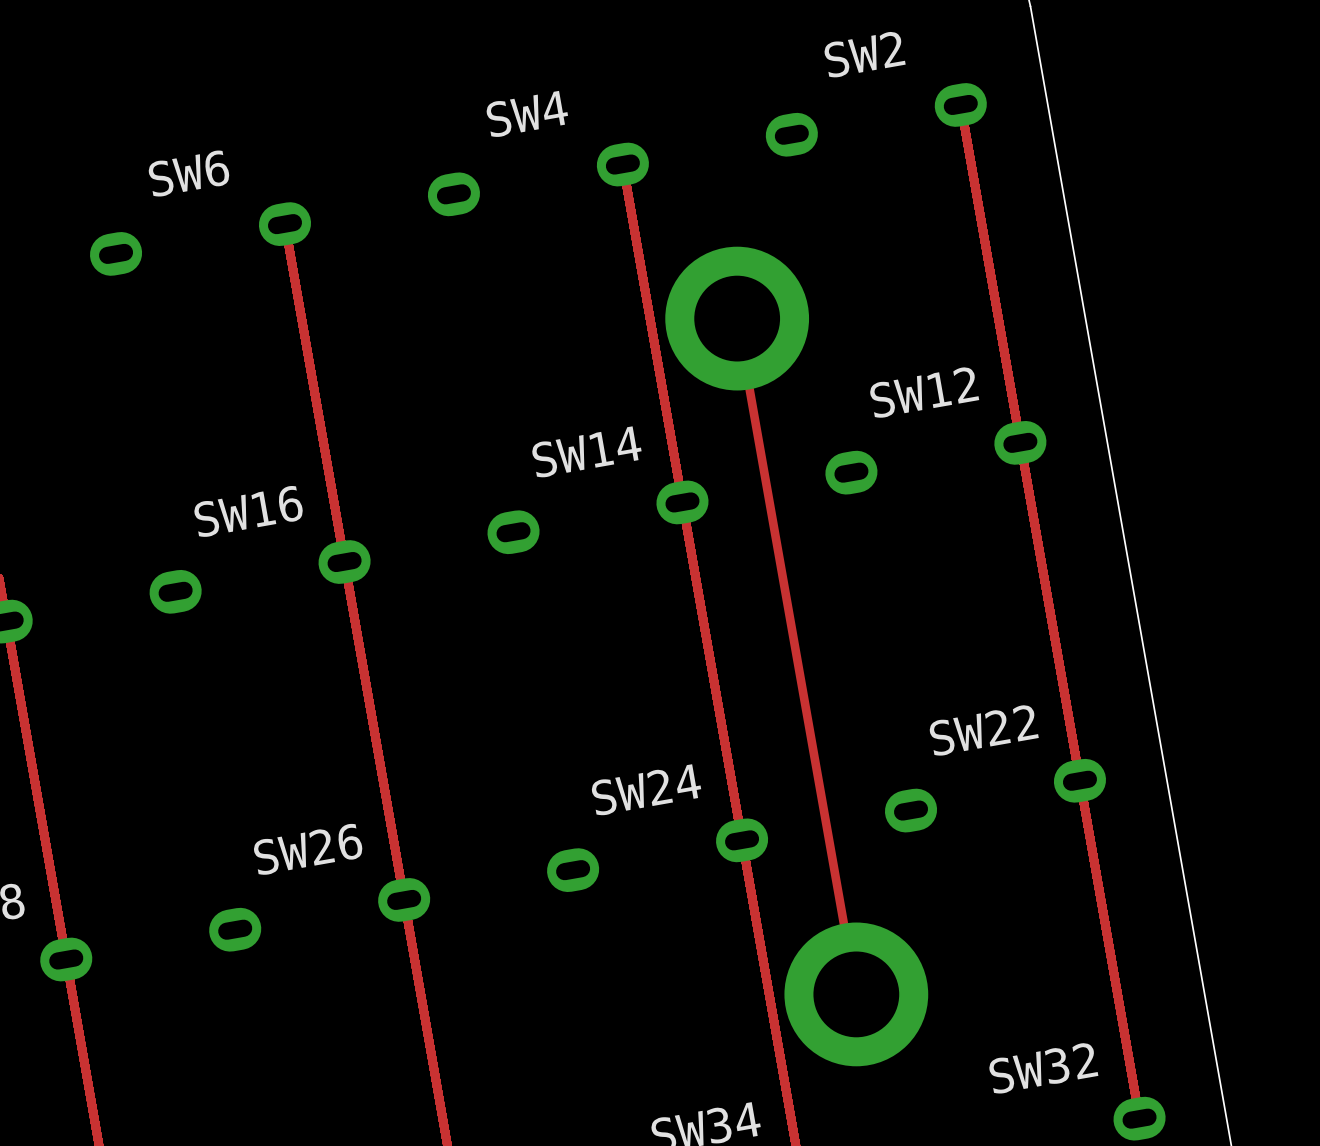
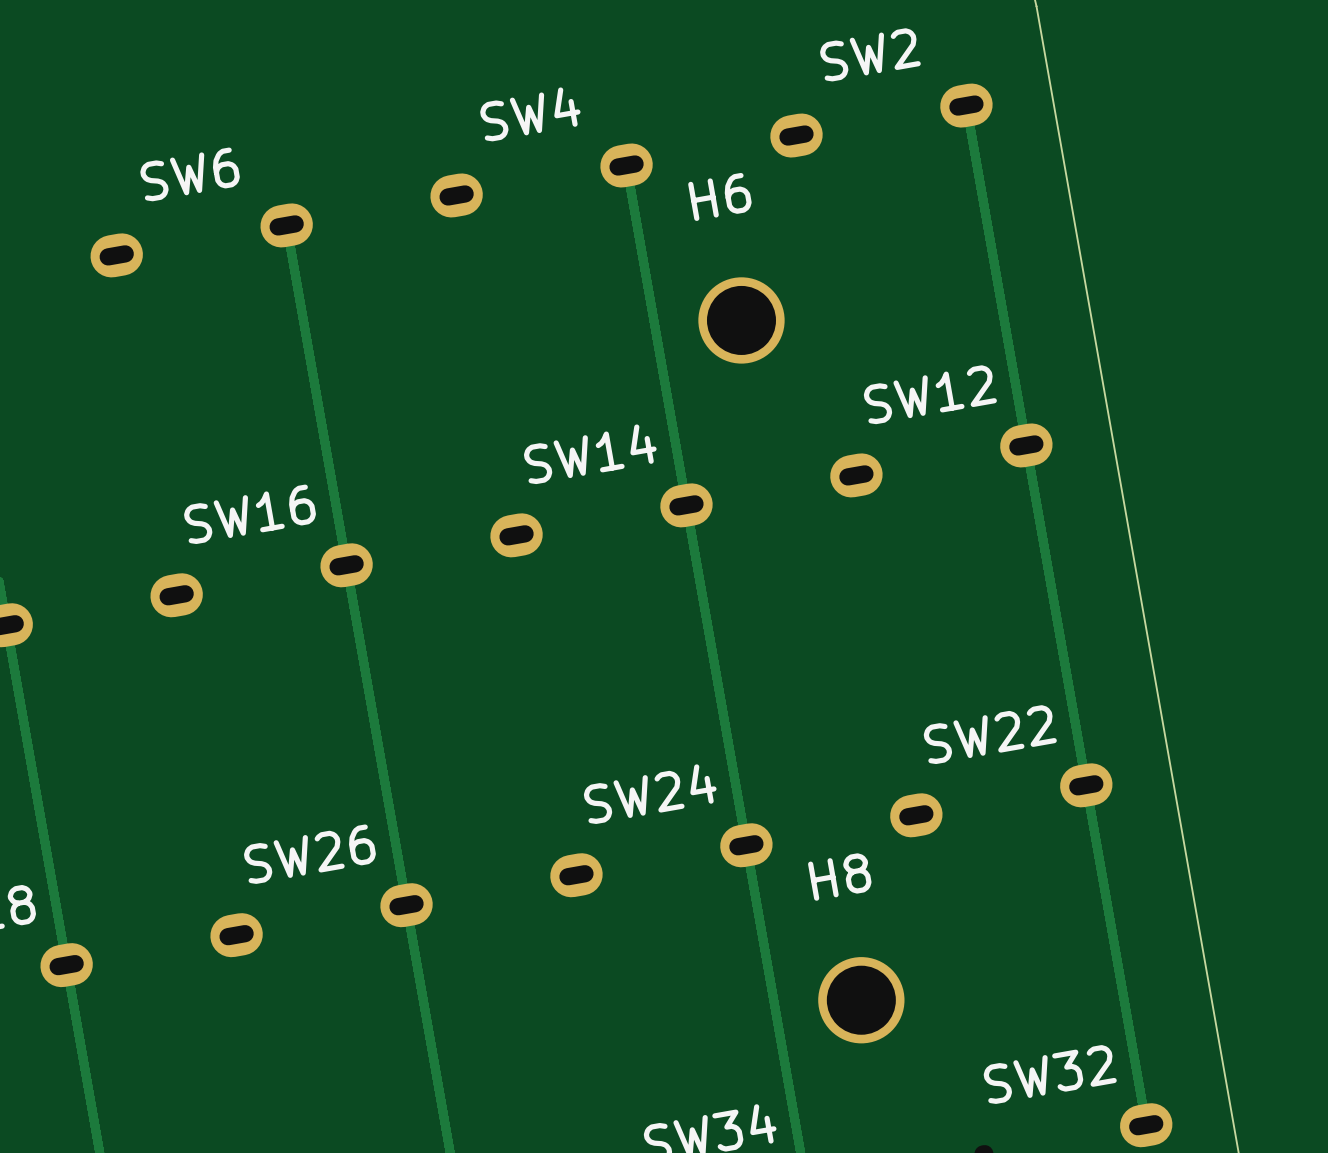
track: (737, 318) (856, 994) -> none
part: (737, 318) -> none
H6: none -> (741, 320)
part: (856, 994) -> none
H8: none -> (861, 1000)

